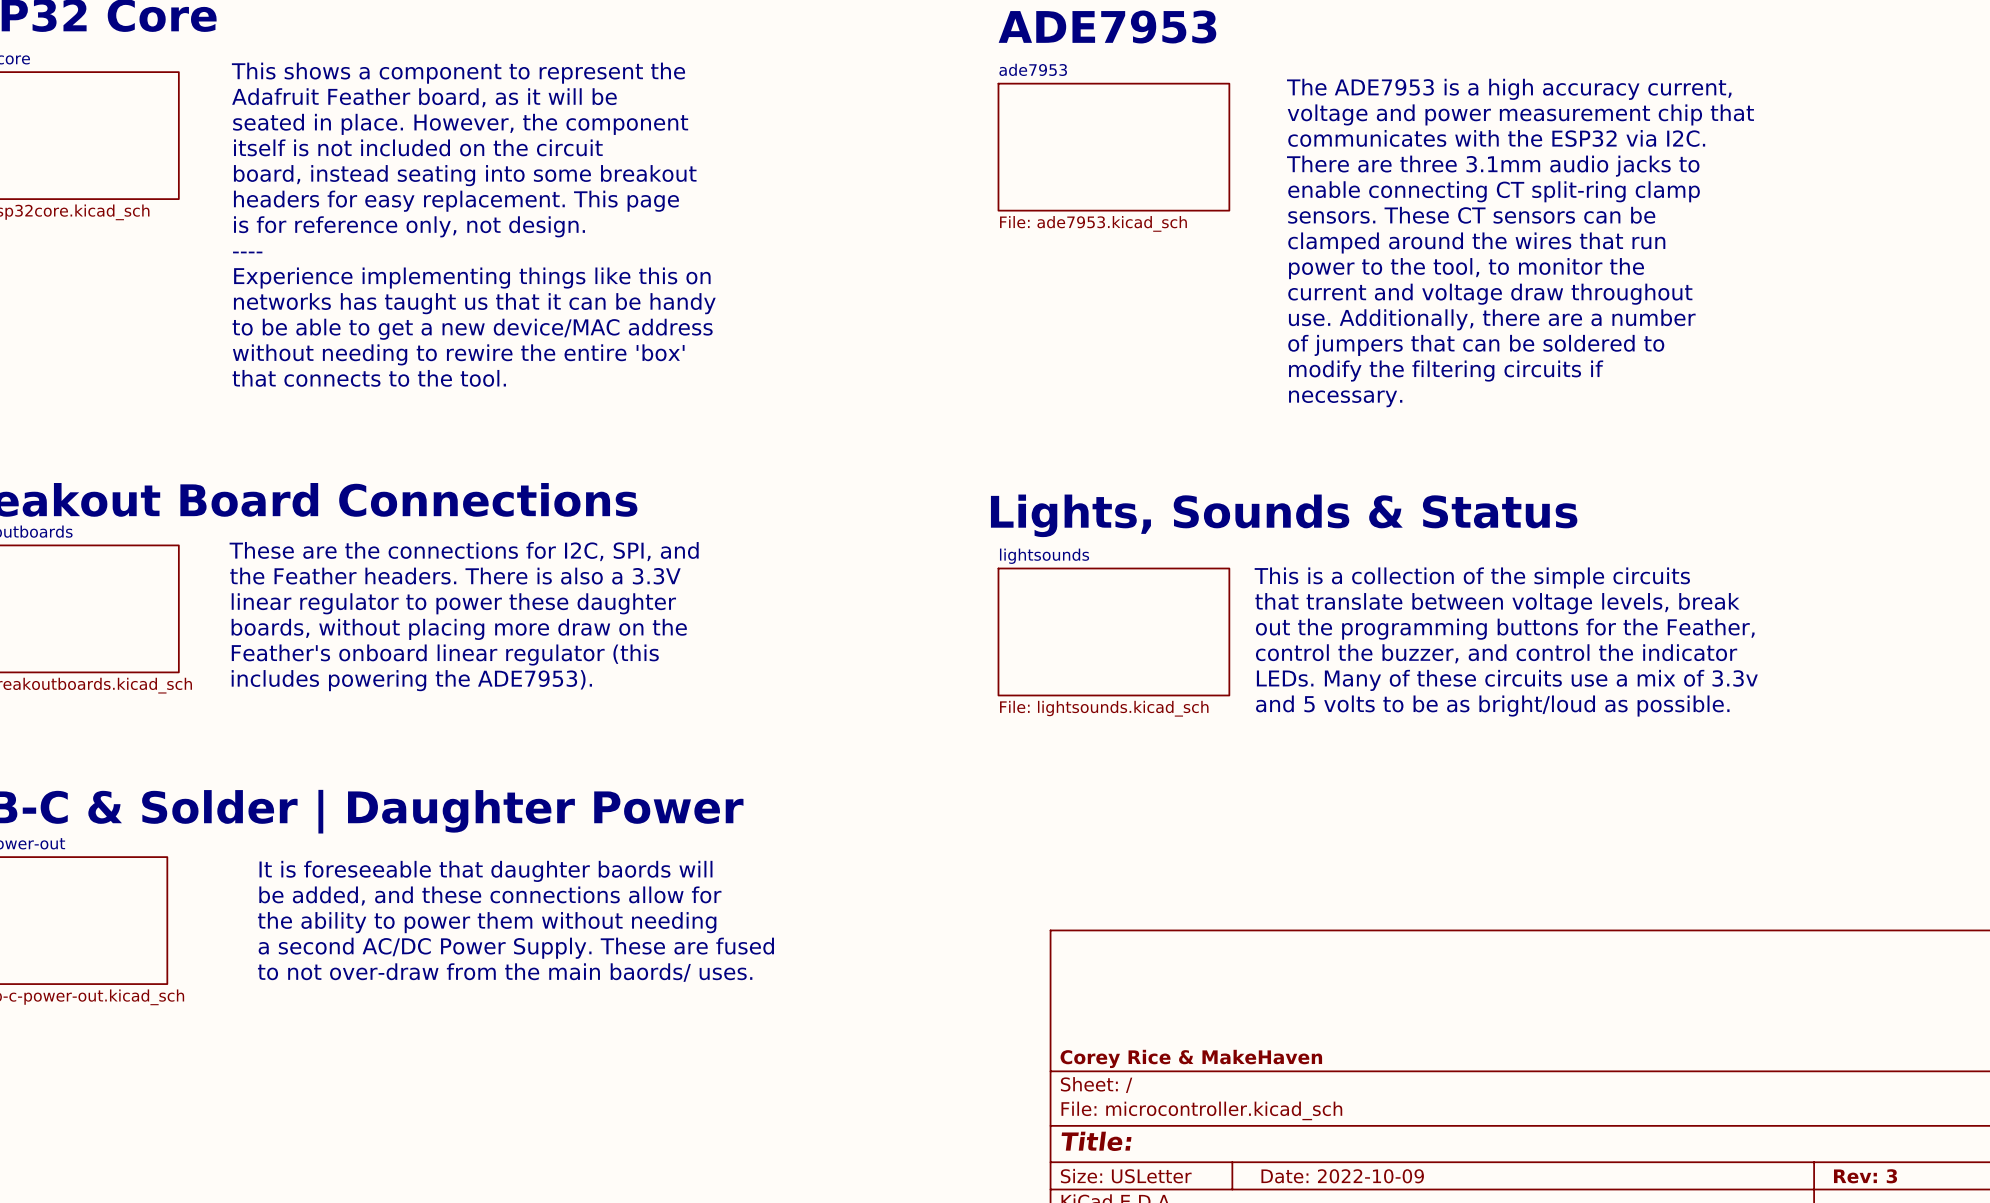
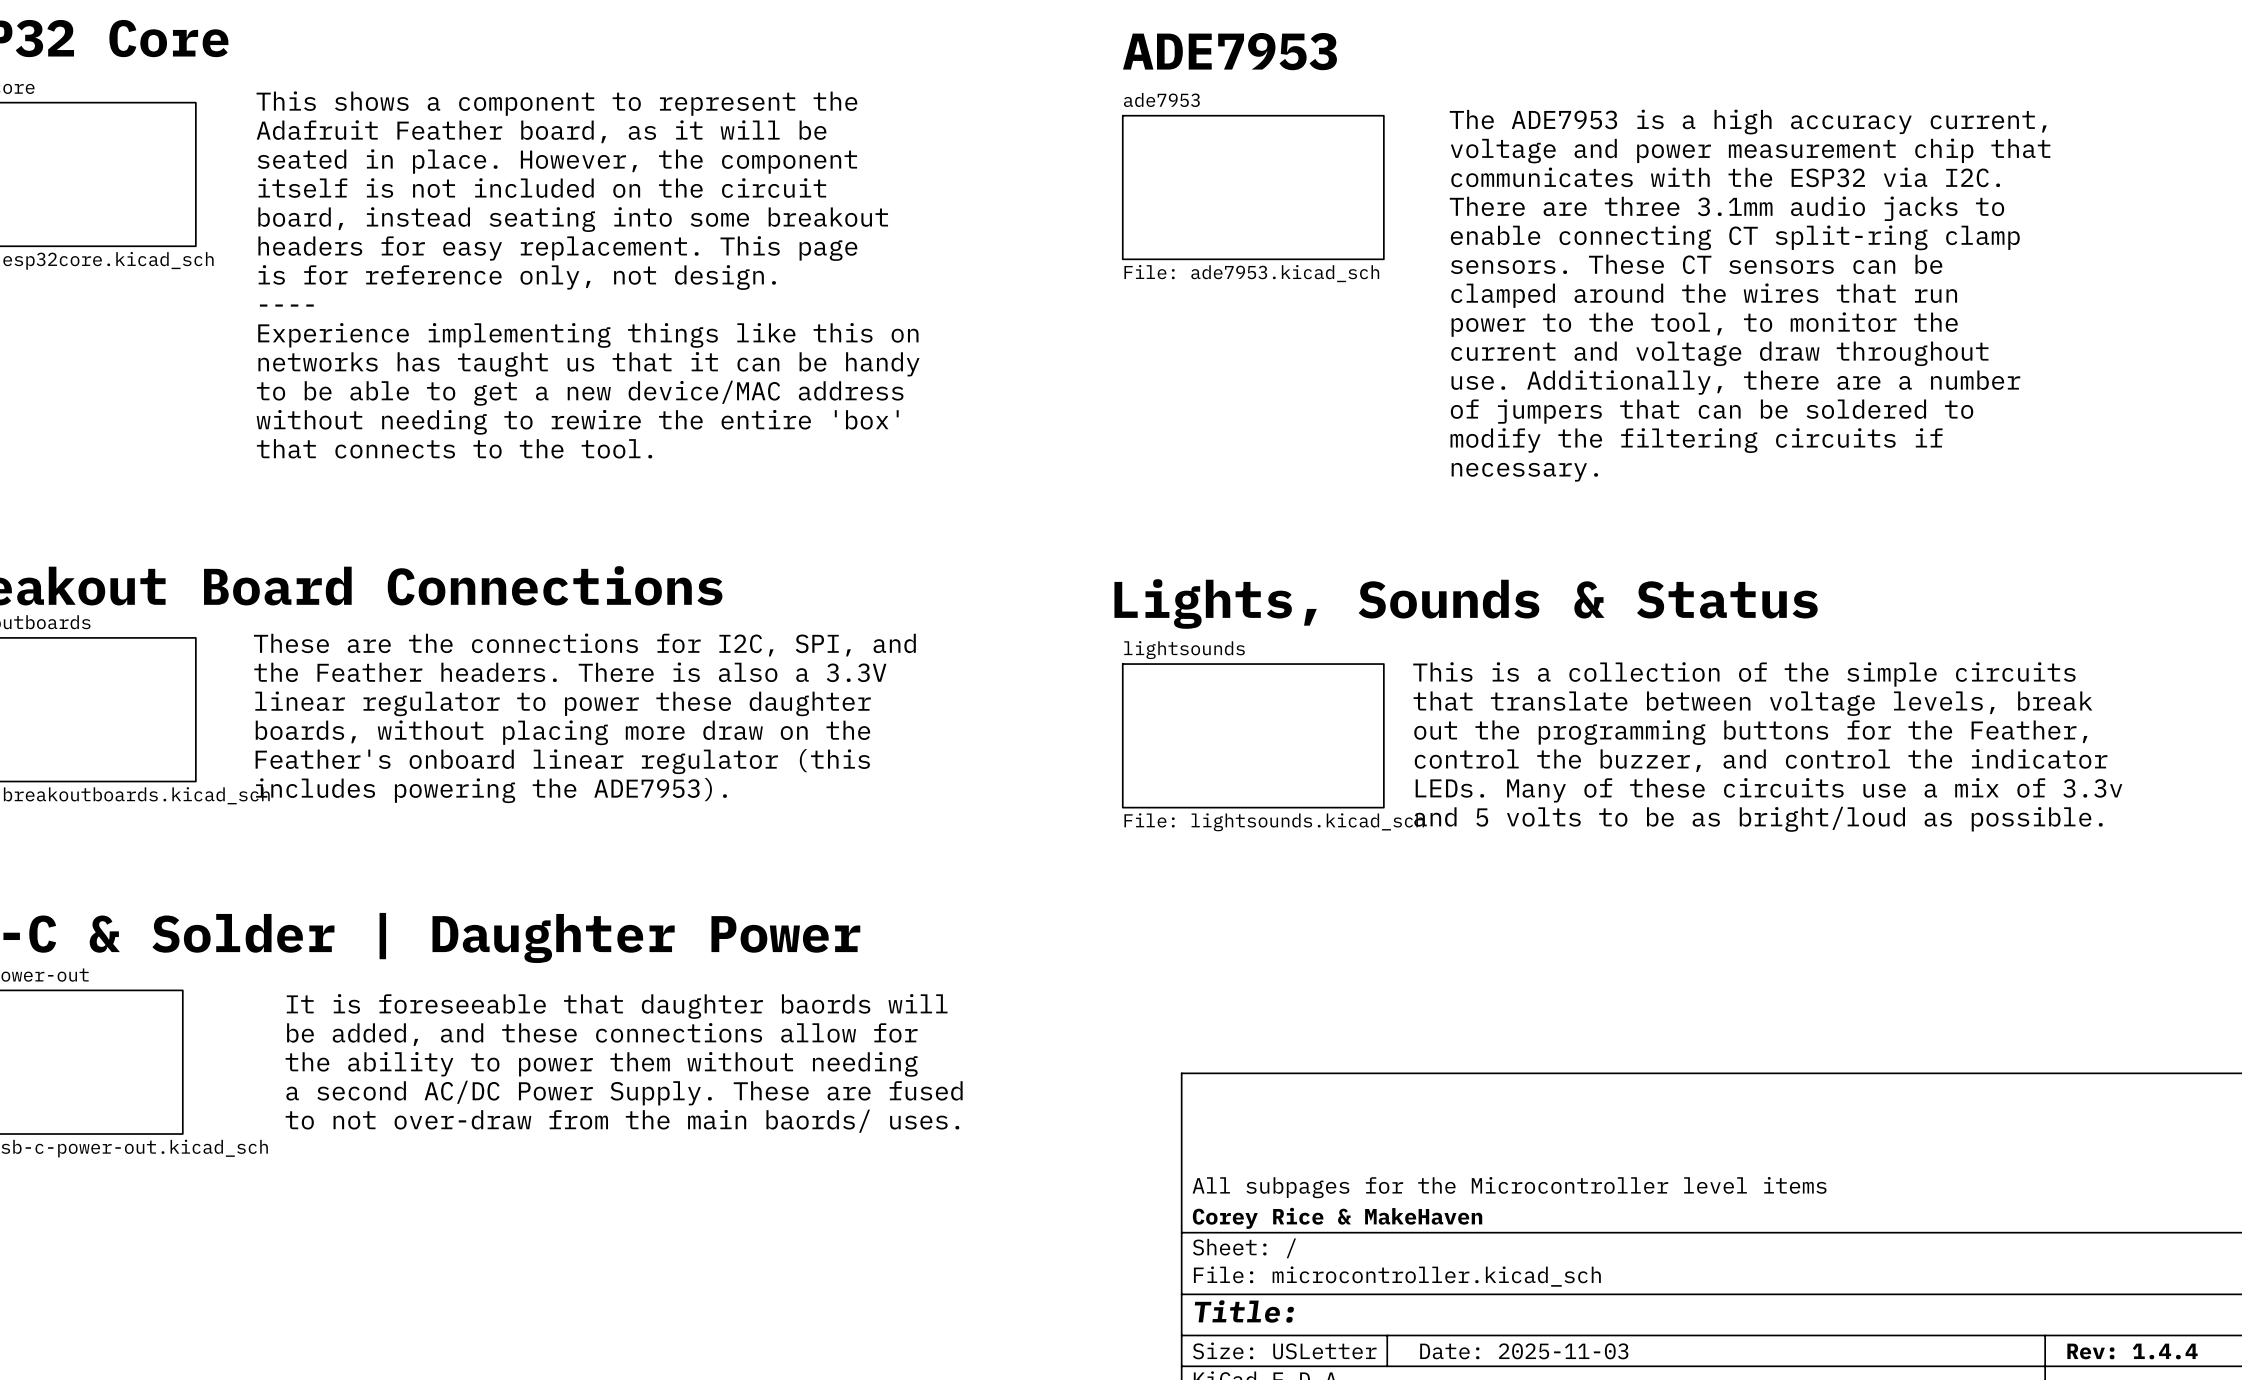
title block: none -> All subpages for the Microcontroller level items (1509, 1187)
title block: Date: 2022-10-09 (1342, 1176) -> Date: 2025-11-03 (1524, 1351)
title block: Rev: 3 (1865, 1176) -> Rev: 1.4.4 (2132, 1351)

